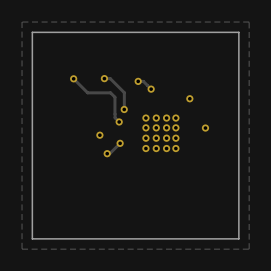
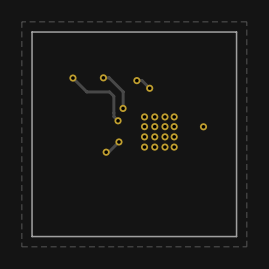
via: (189, 98) -> none
via: (99, 135) -> none

